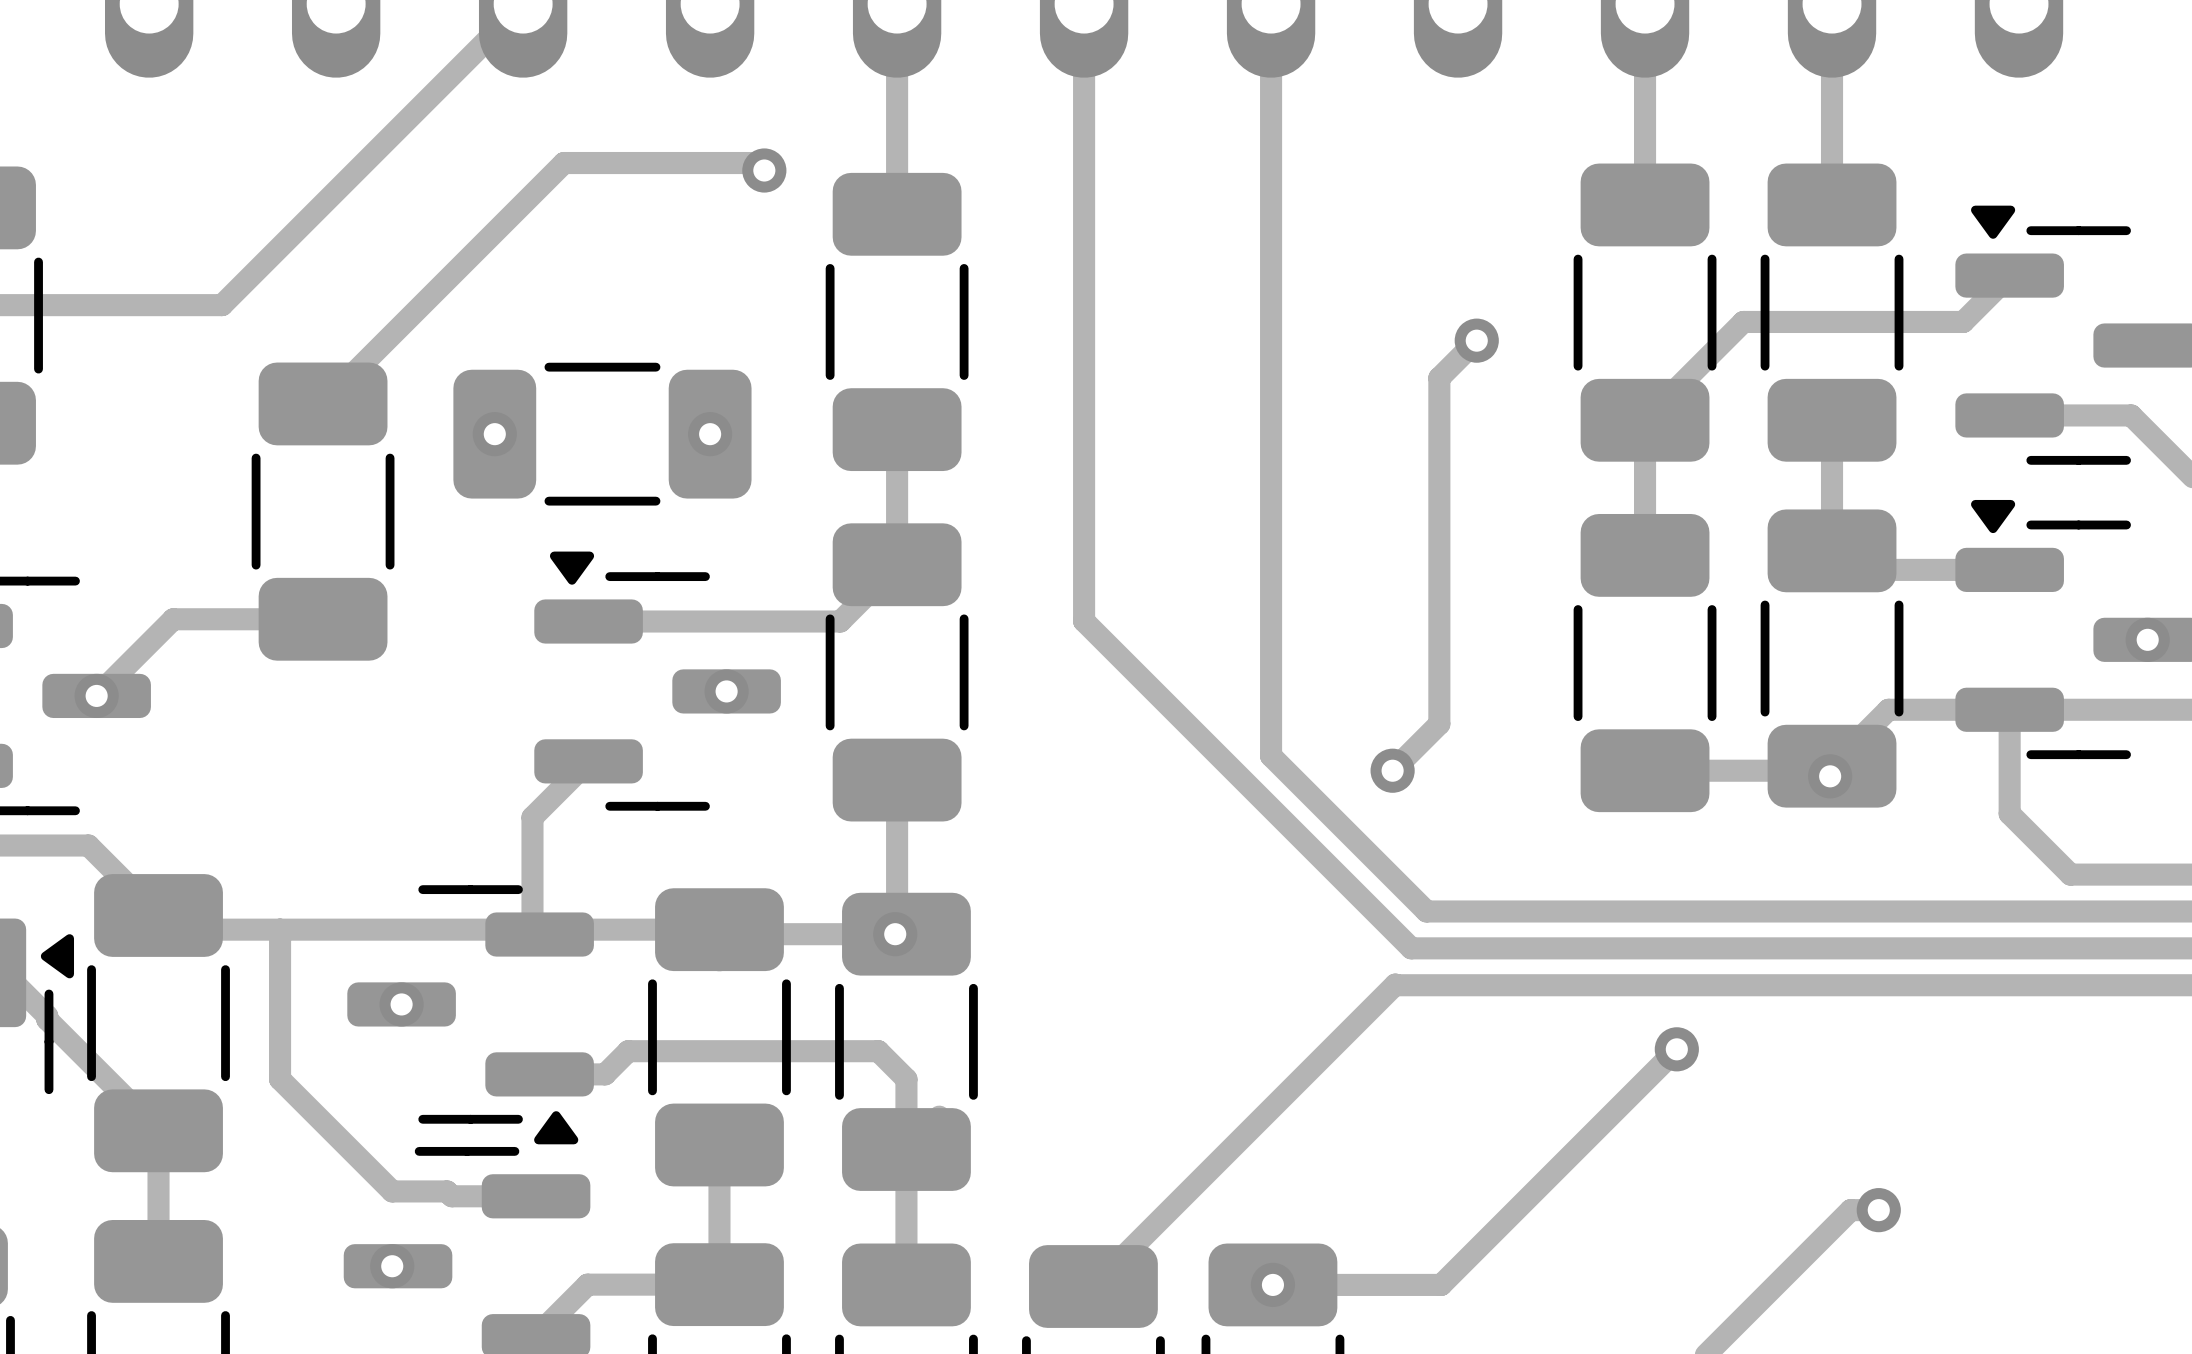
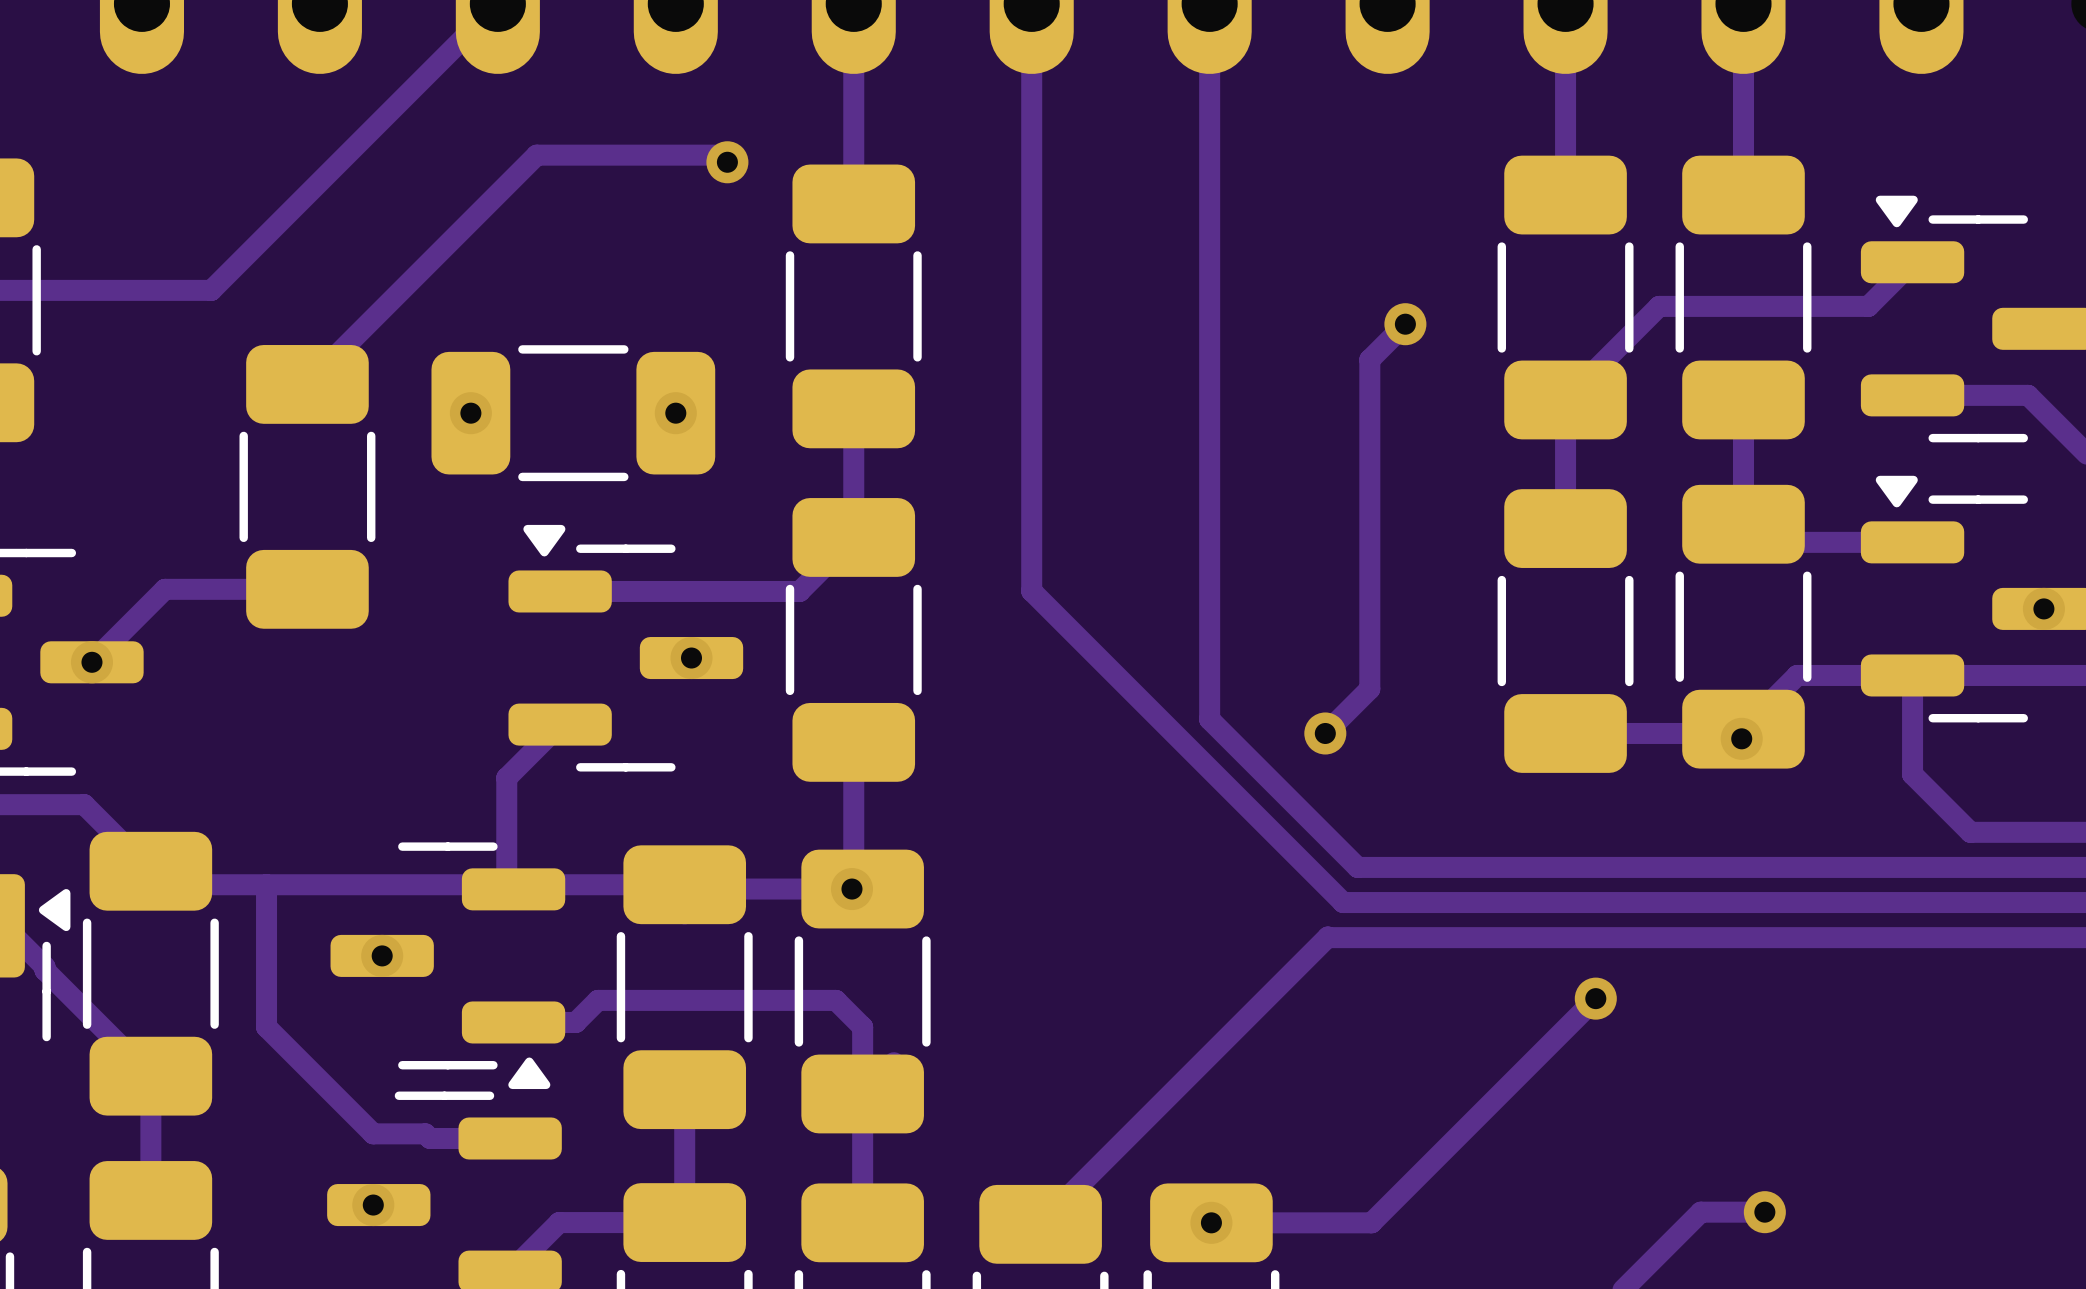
track: (1878, 1210) (1850, 1210) (1787, 1273) -> (1764, 1212) (1700, 1212)
via position: (1878, 1210) -> (1764, 1212)

